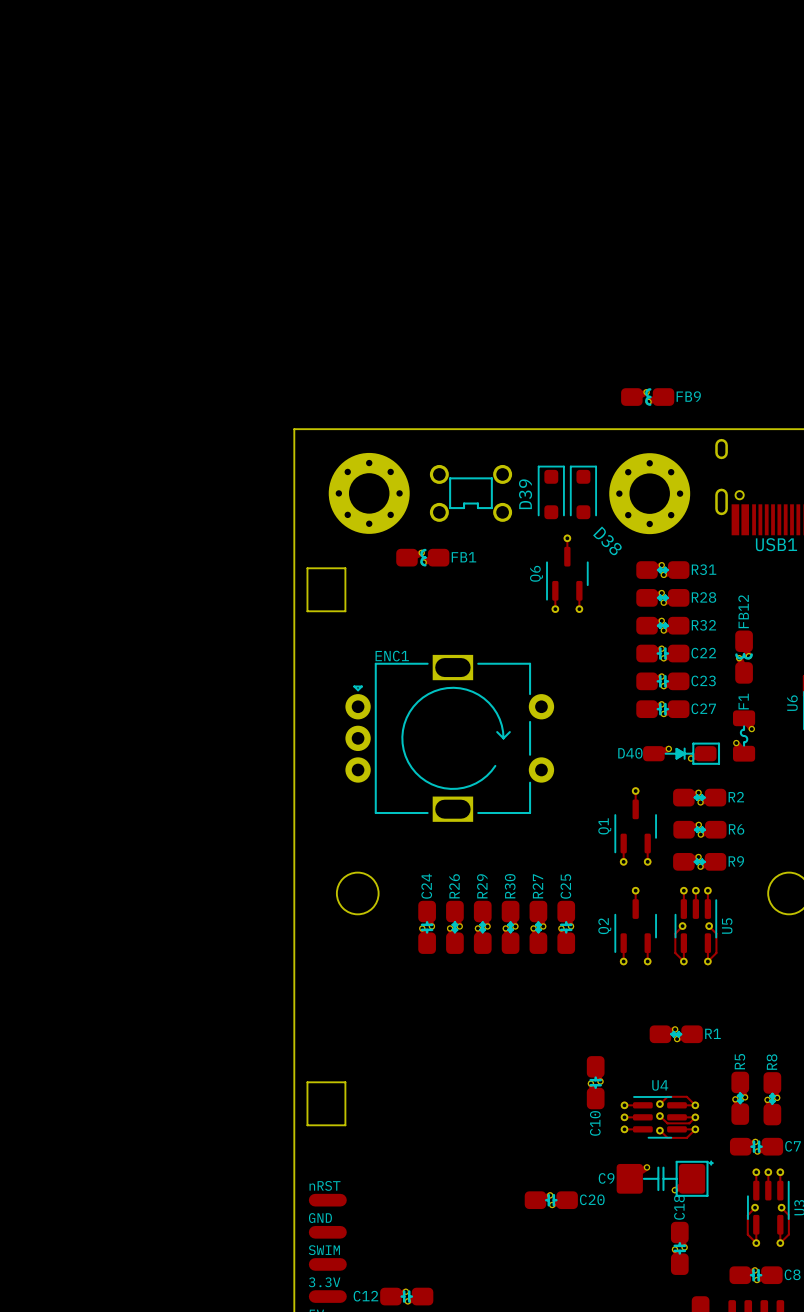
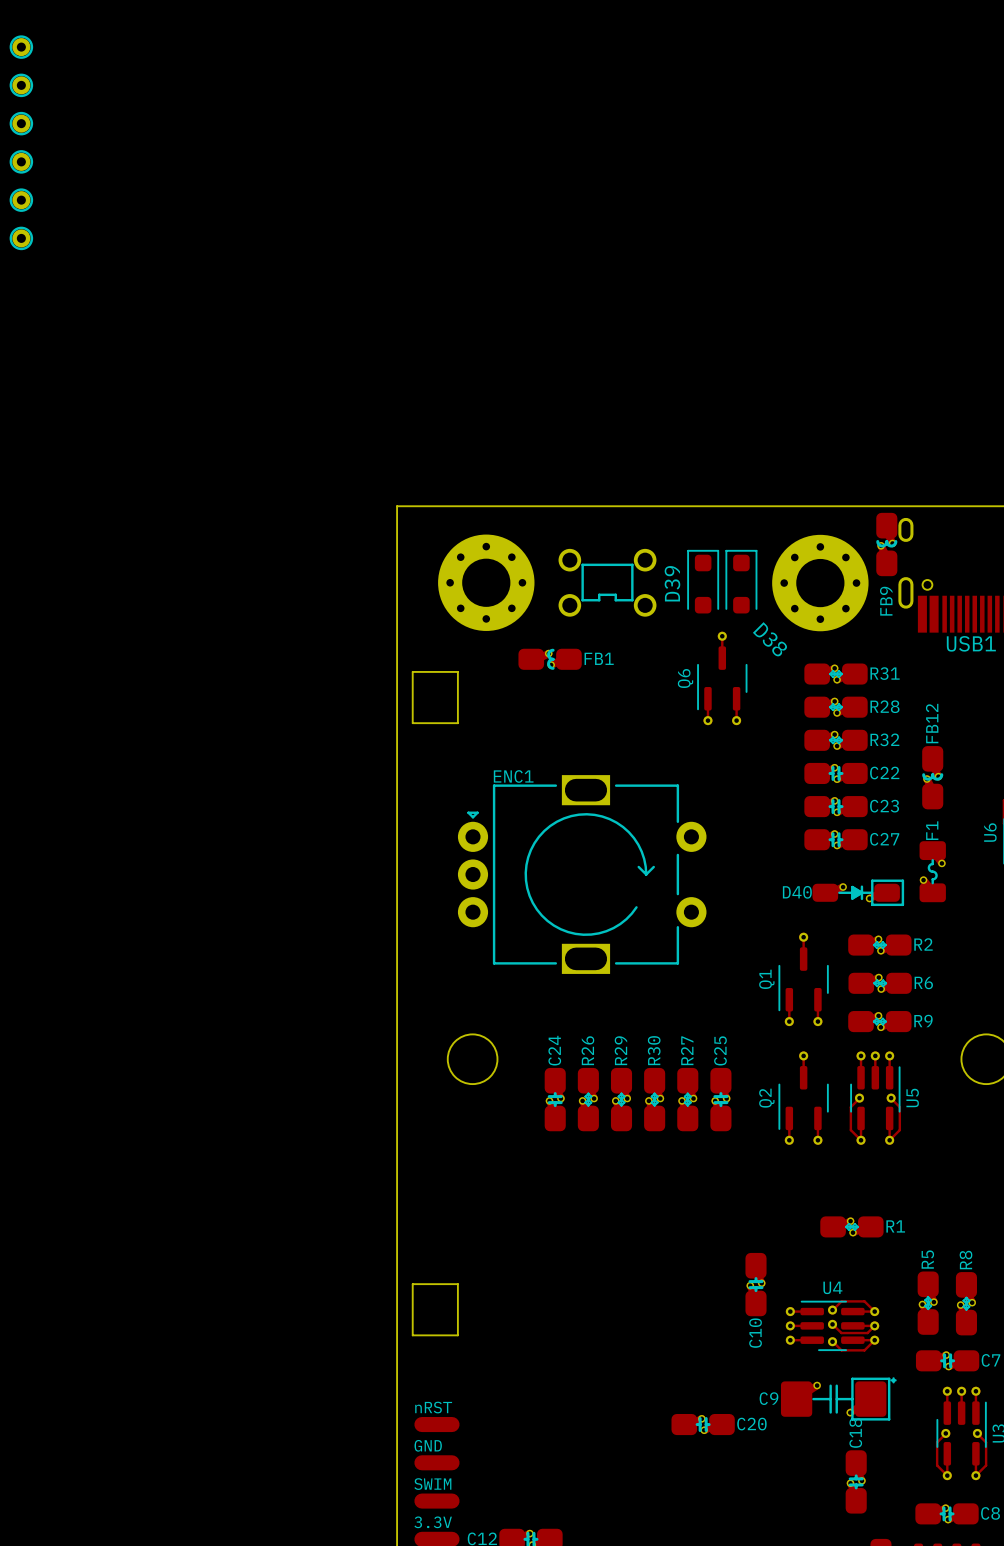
FB9 name position: FB9 (688, 396) -> FB9 (886, 601)
FB9 rotation: 0° (647, 397) -> 90° counterclockwise (886, 544)
FB9 position: (647, 397) -> (886, 544)

